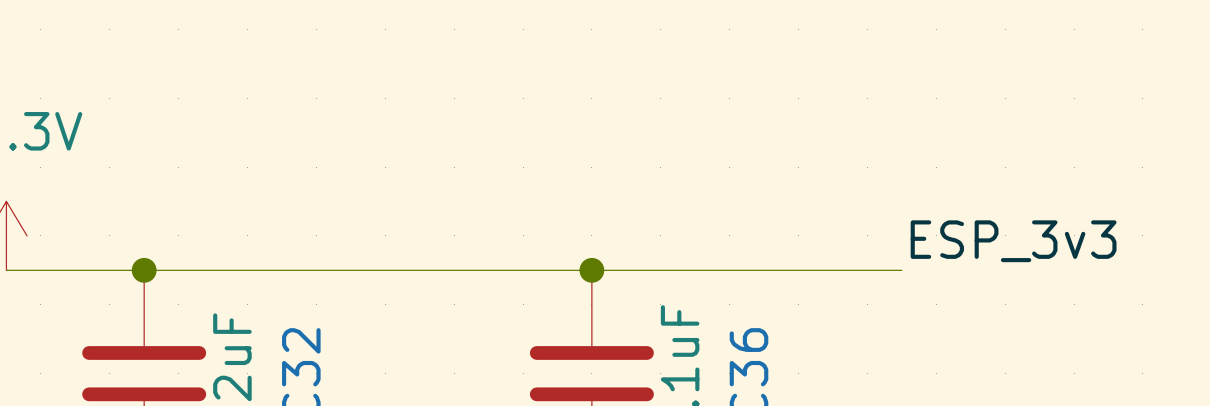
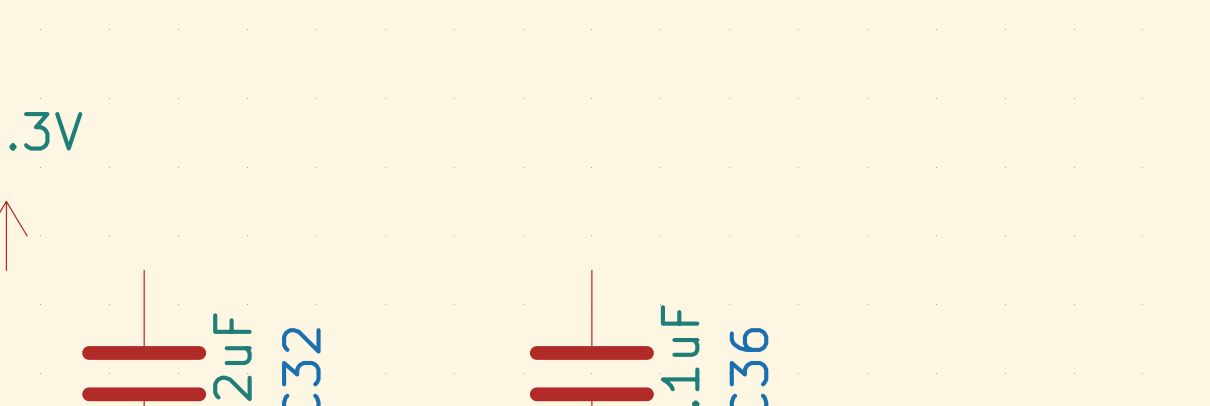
label: ESP_3v3 (1013, 241) -> none
wire: (6, 270) (901, 270) -> none
junction: (144, 270) -> none
junction: (591, 270) -> none

